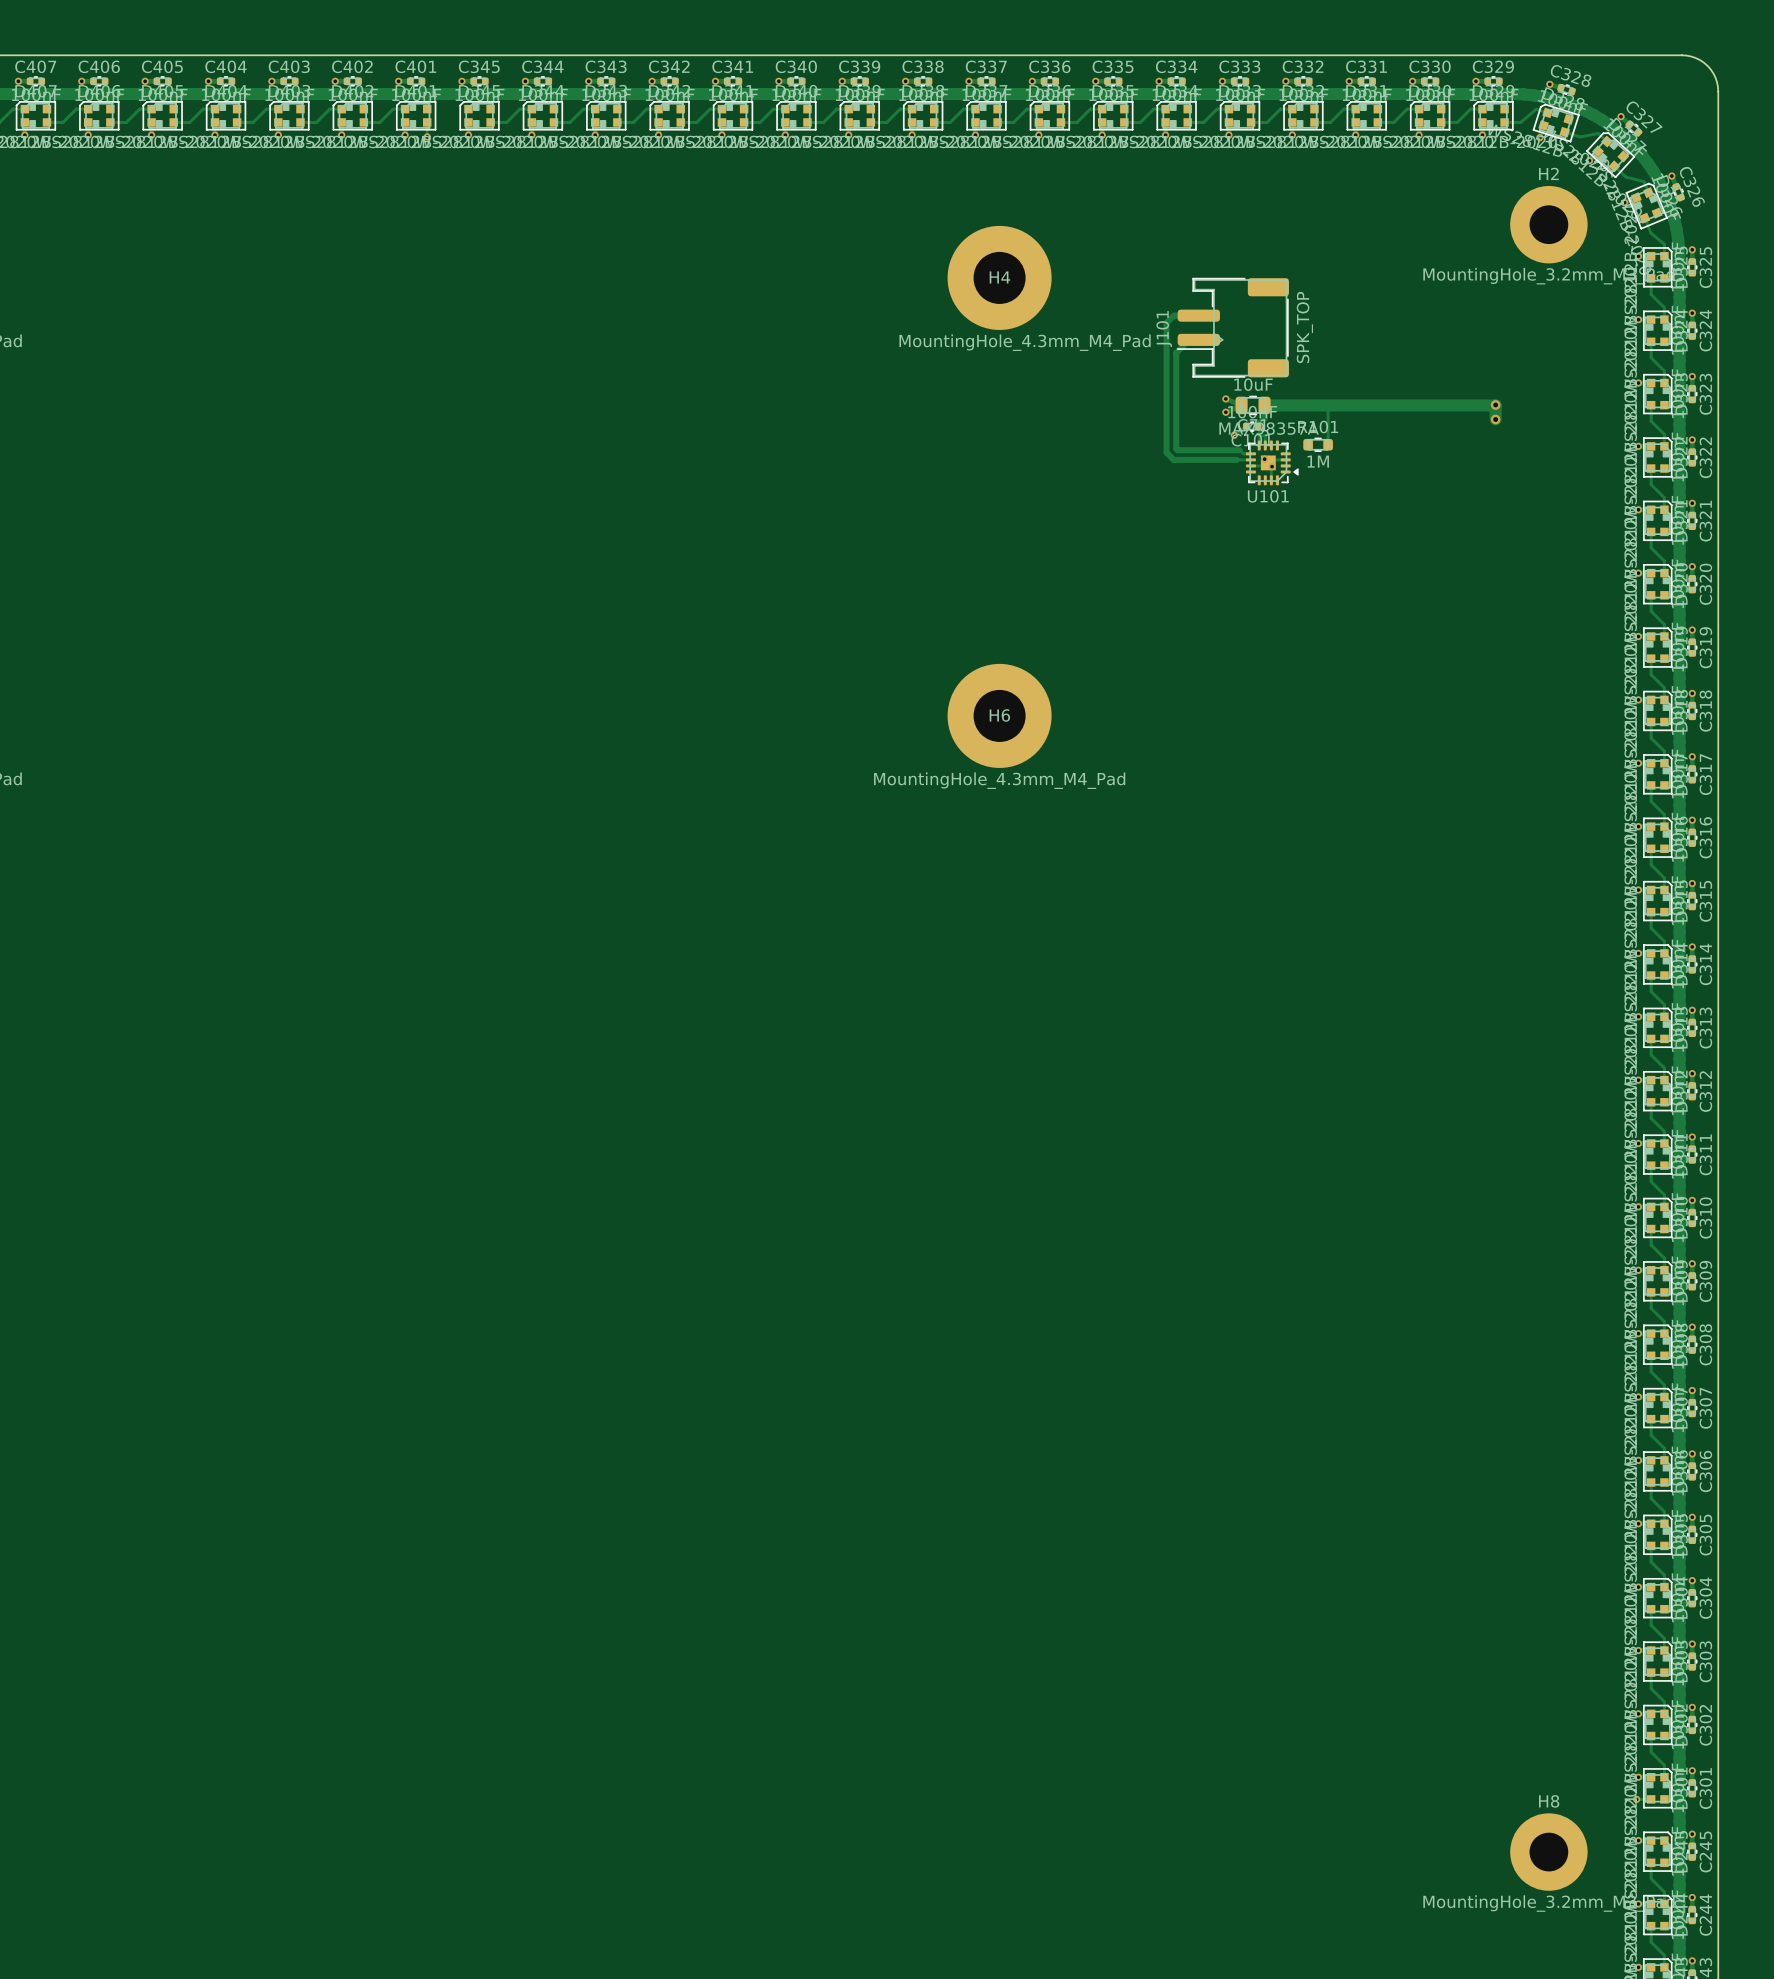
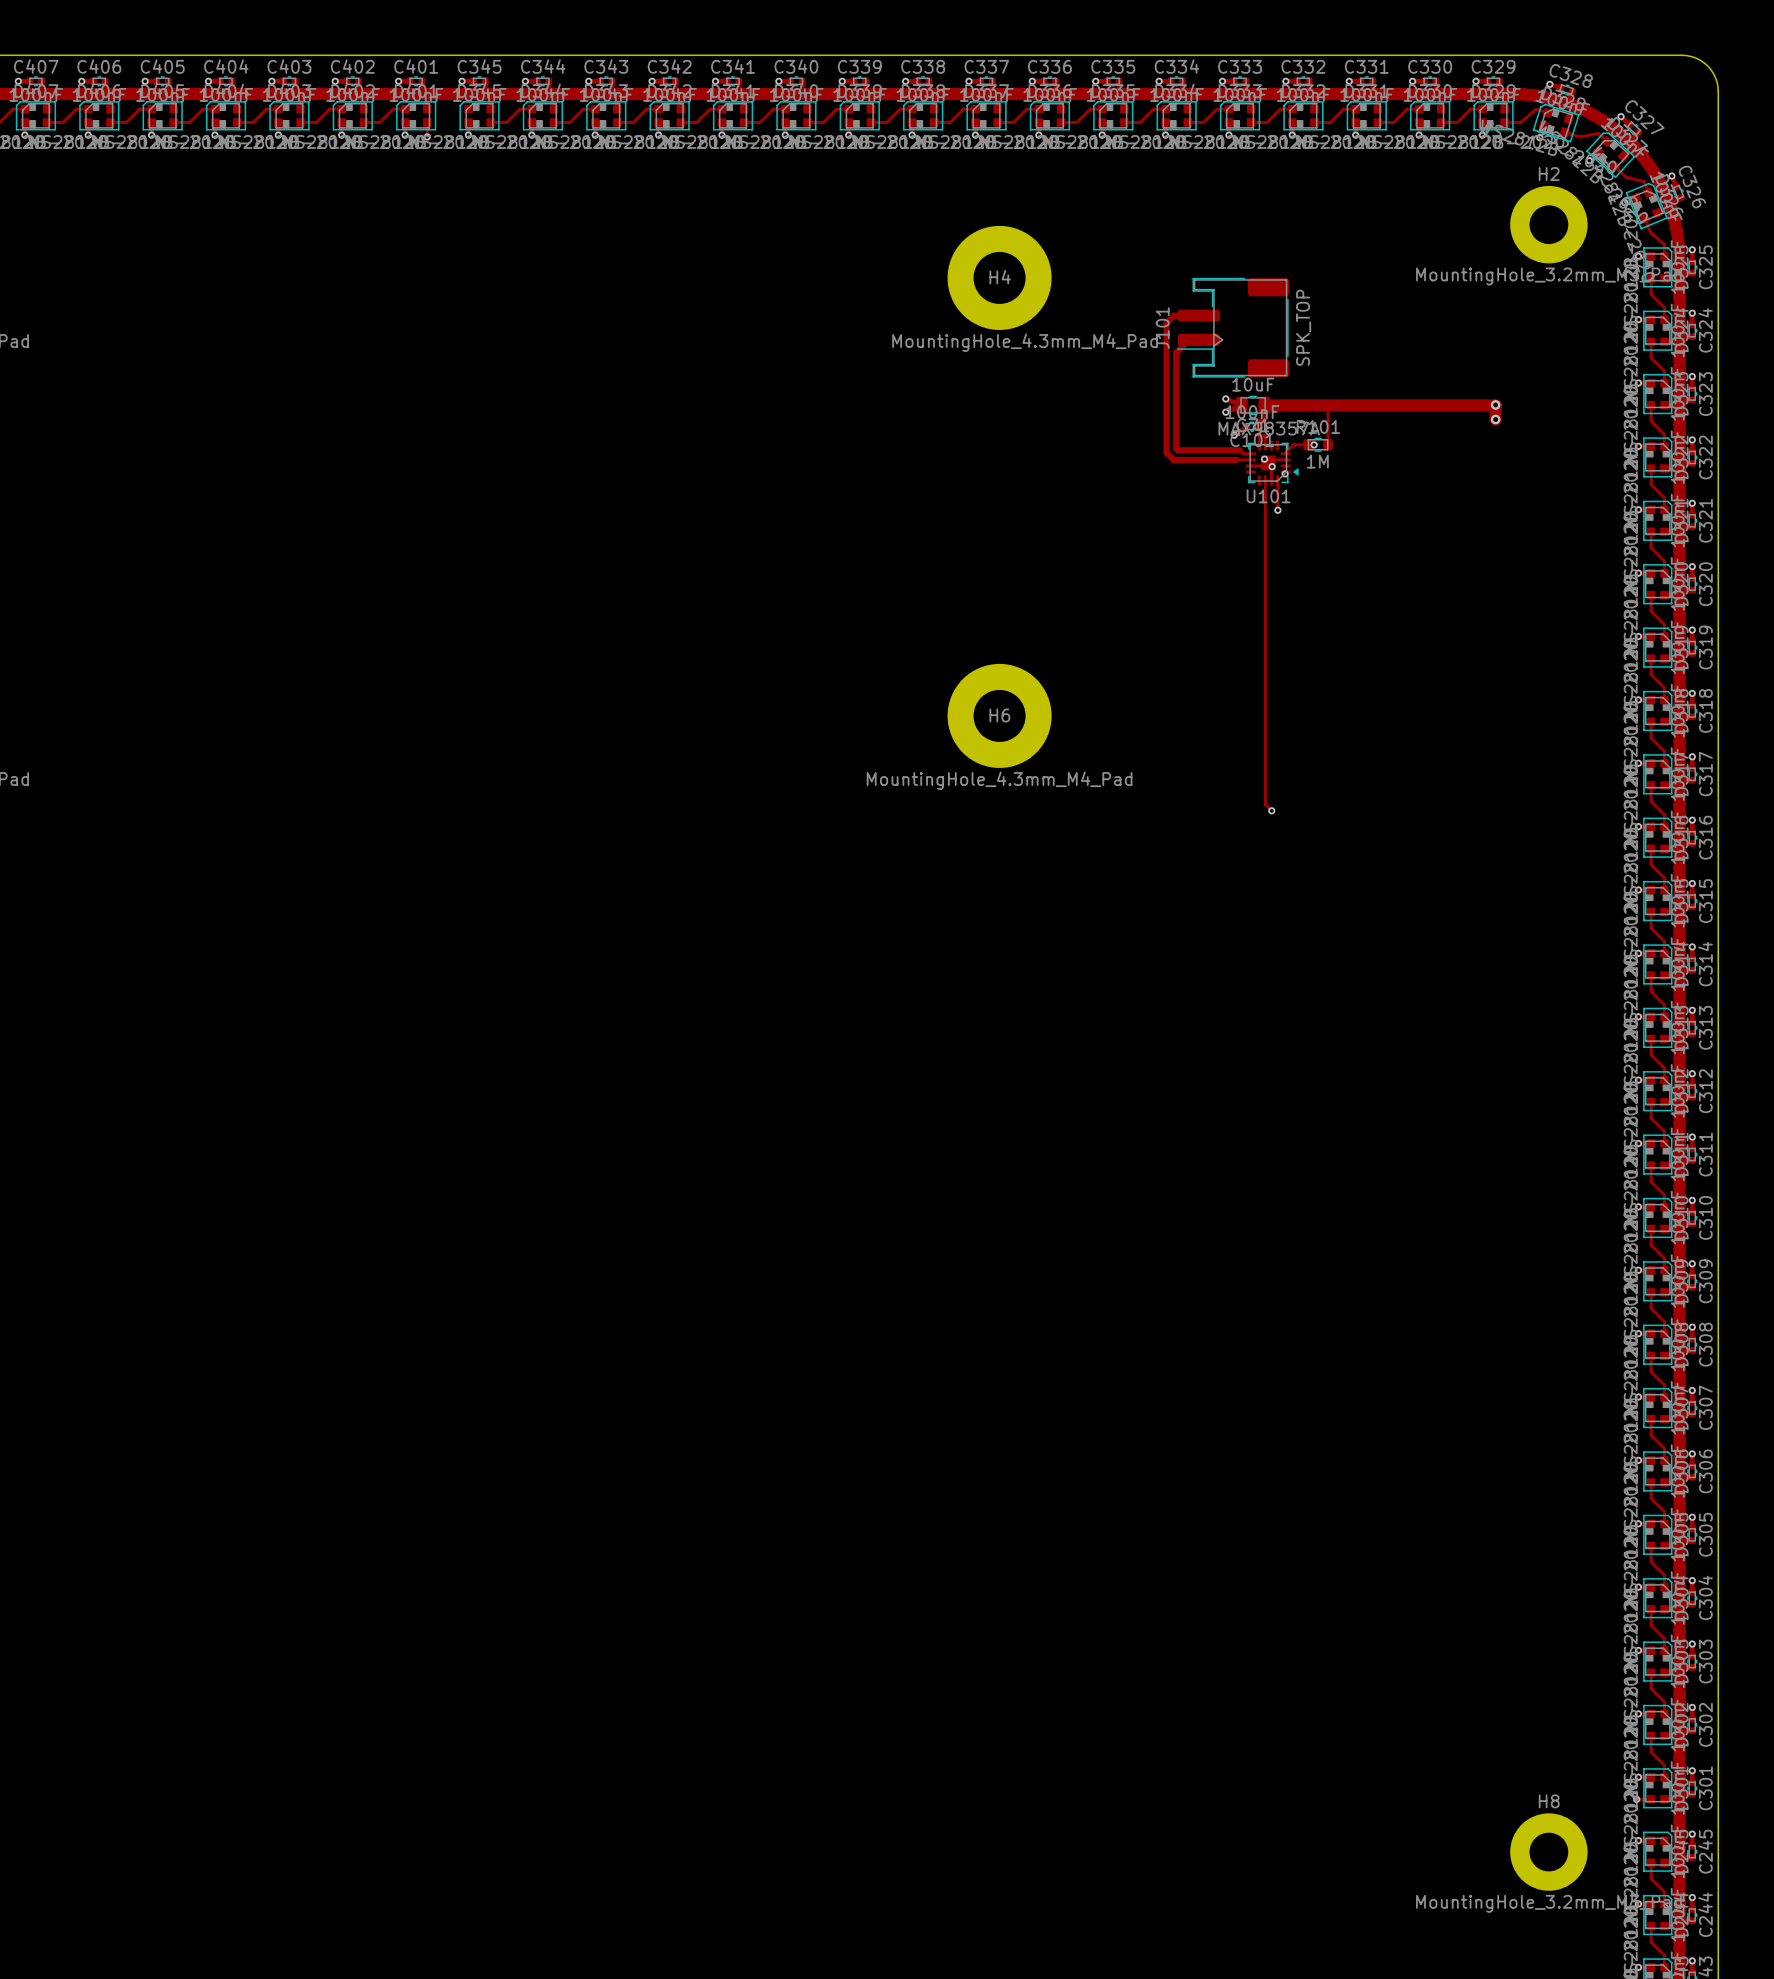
track: none -> (1314, 444) (1293, 444) (1285, 453)
via: none -> (1314, 444)
via: none -> (1285, 473)
track: none -> (1265, 480) (1265, 804) (1271, 810)
track: none -> (1277, 480) (1277, 510)
via: none -> (1277, 510)
via: none -> (1271, 810)

